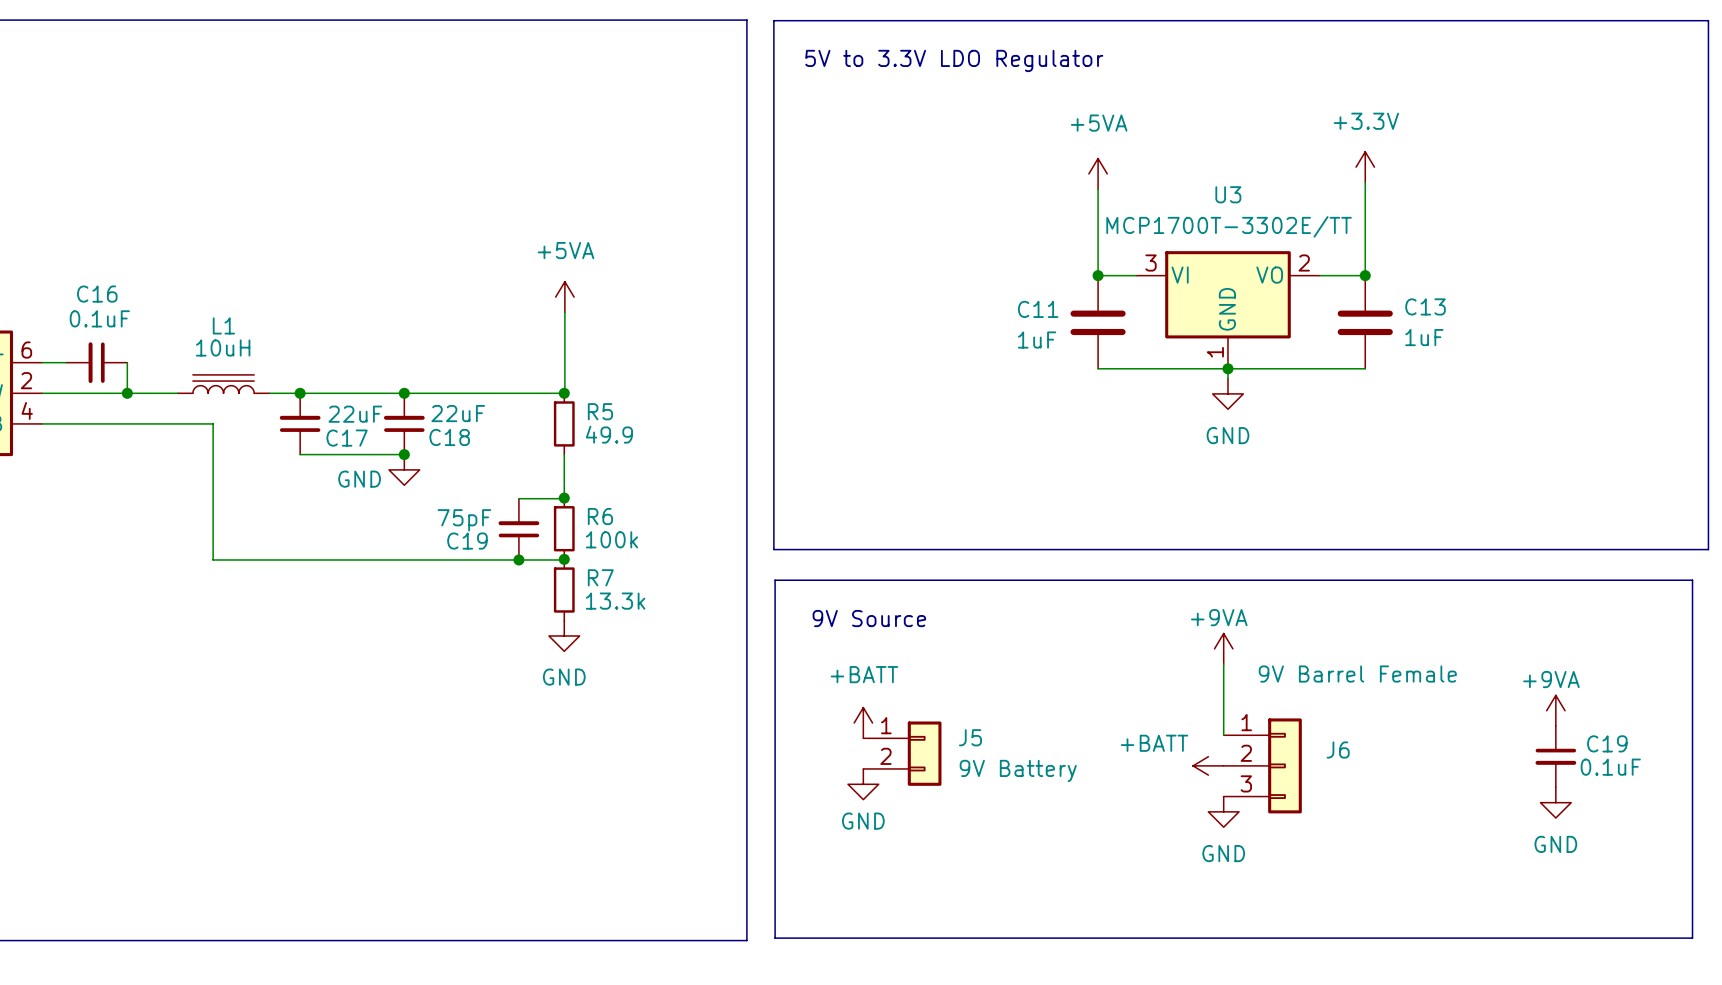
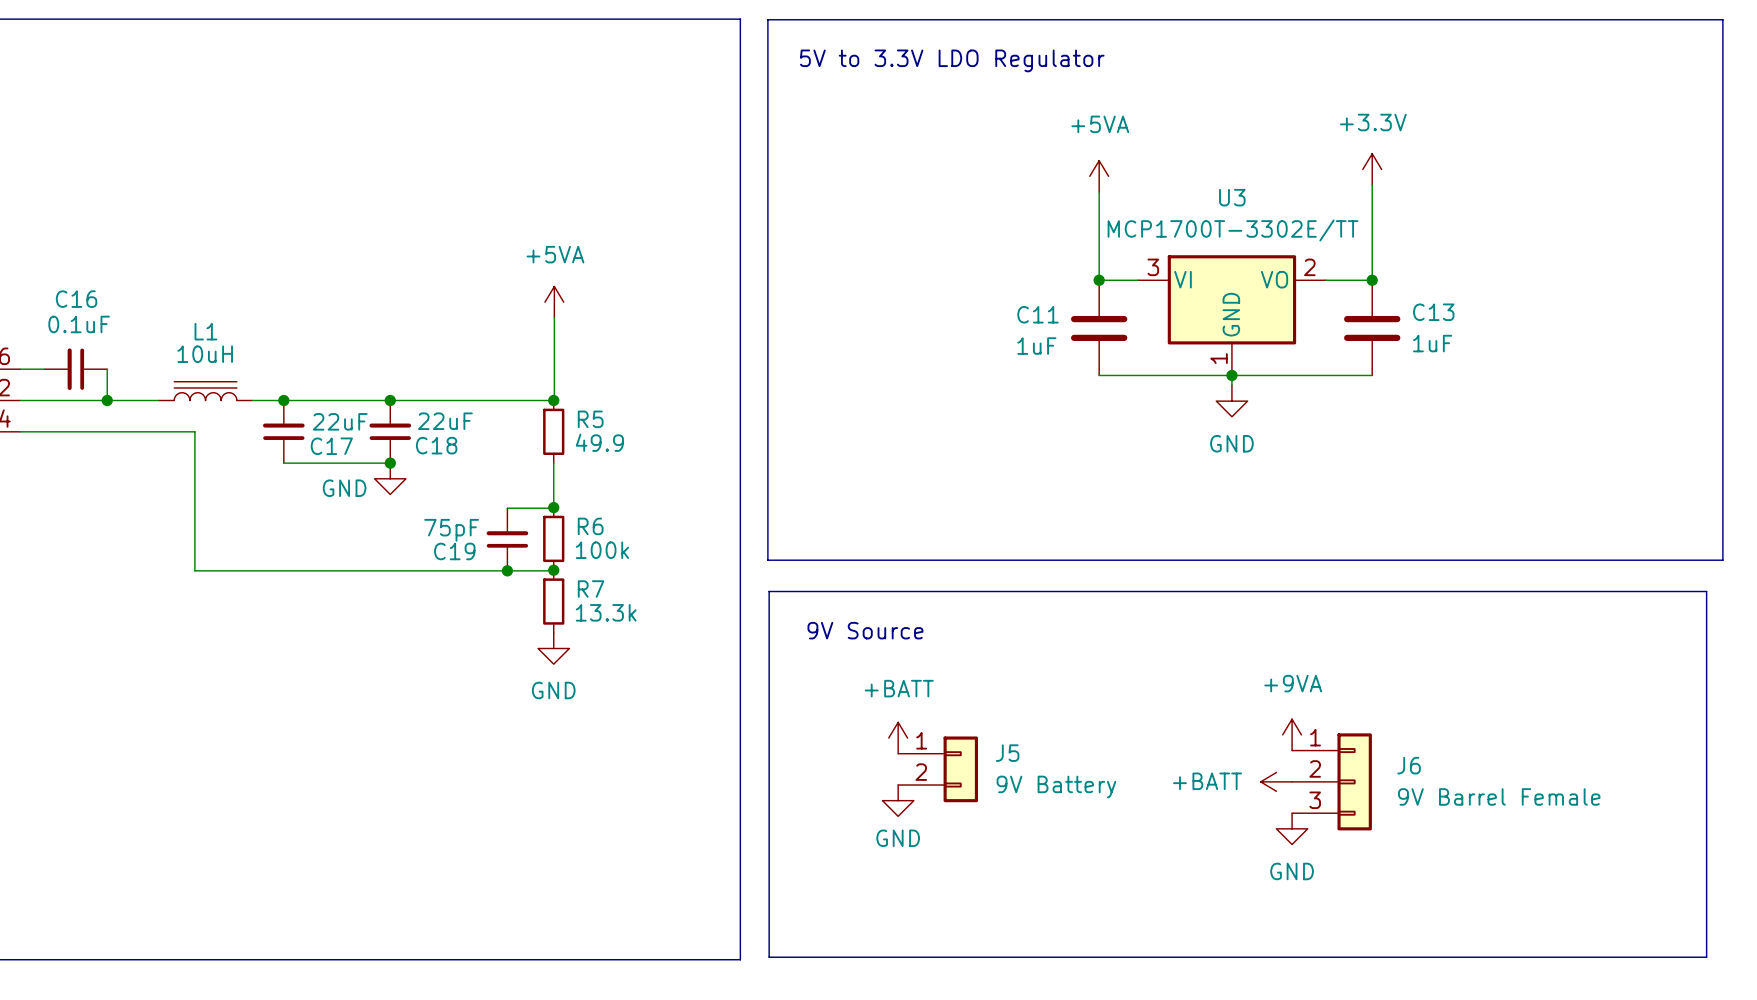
power symbol text position: +9VA (1219, 617) -> +9VA (1293, 683)
power symbol position: +9VA (1223, 648) -> +9VA (1292, 734)
wire: (1223, 664) (1223, 735) -> none
J6 value position: 9V Barrel Female (1357, 674) -> 9V Barrel Female (1499, 796)
power symbol: +9VA (1555, 710) -> none
power symbol position: +BATT (863, 723) -> +BATT (898, 738)
power symbol text position: +BATT (1154, 743) -> +BATT (1207, 781)
J5 position: (902, 753) -> (938, 769)
C19: 0.1uF (1555, 756) -> none
power symbol position: +BATT (1208, 765) -> +BATT (1276, 781)
J6 position: (1262, 765) -> (1331, 781)
power symbol position: GND (863, 784) -> GND (898, 800)
power symbol: GND (1555, 802) -> none
power symbol position: GND (1223, 811) -> GND (1292, 828)

